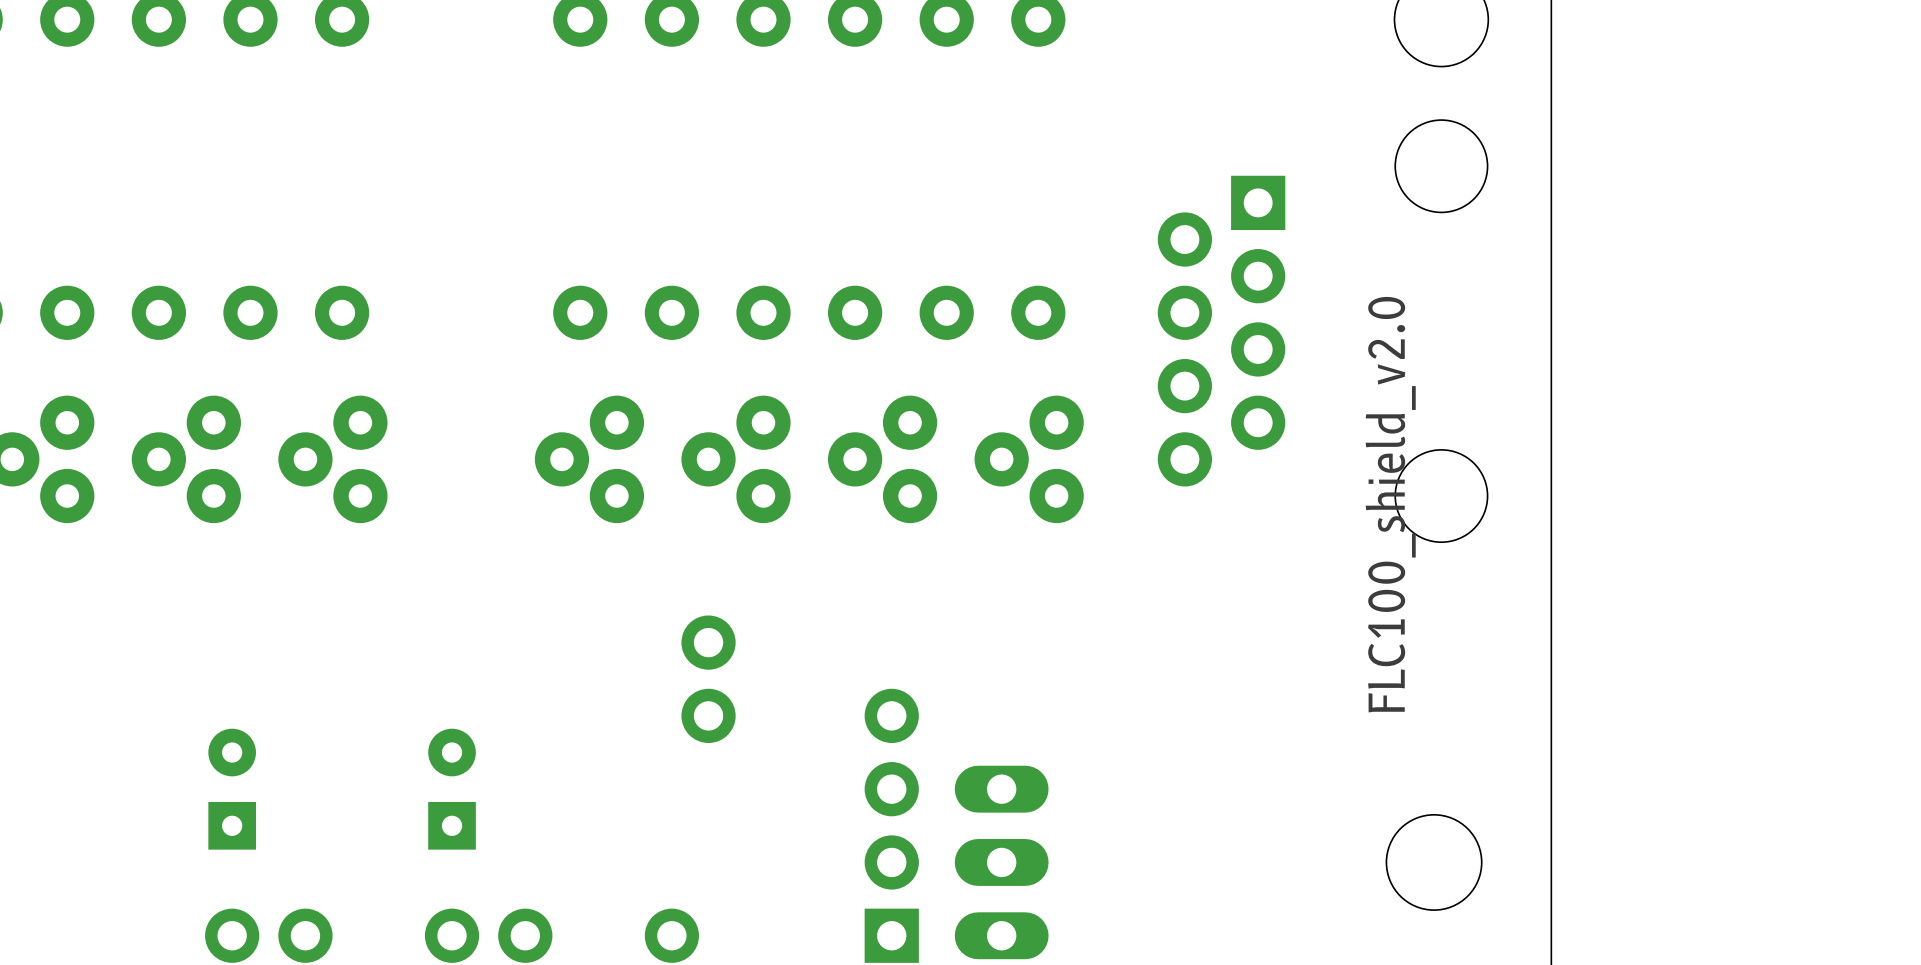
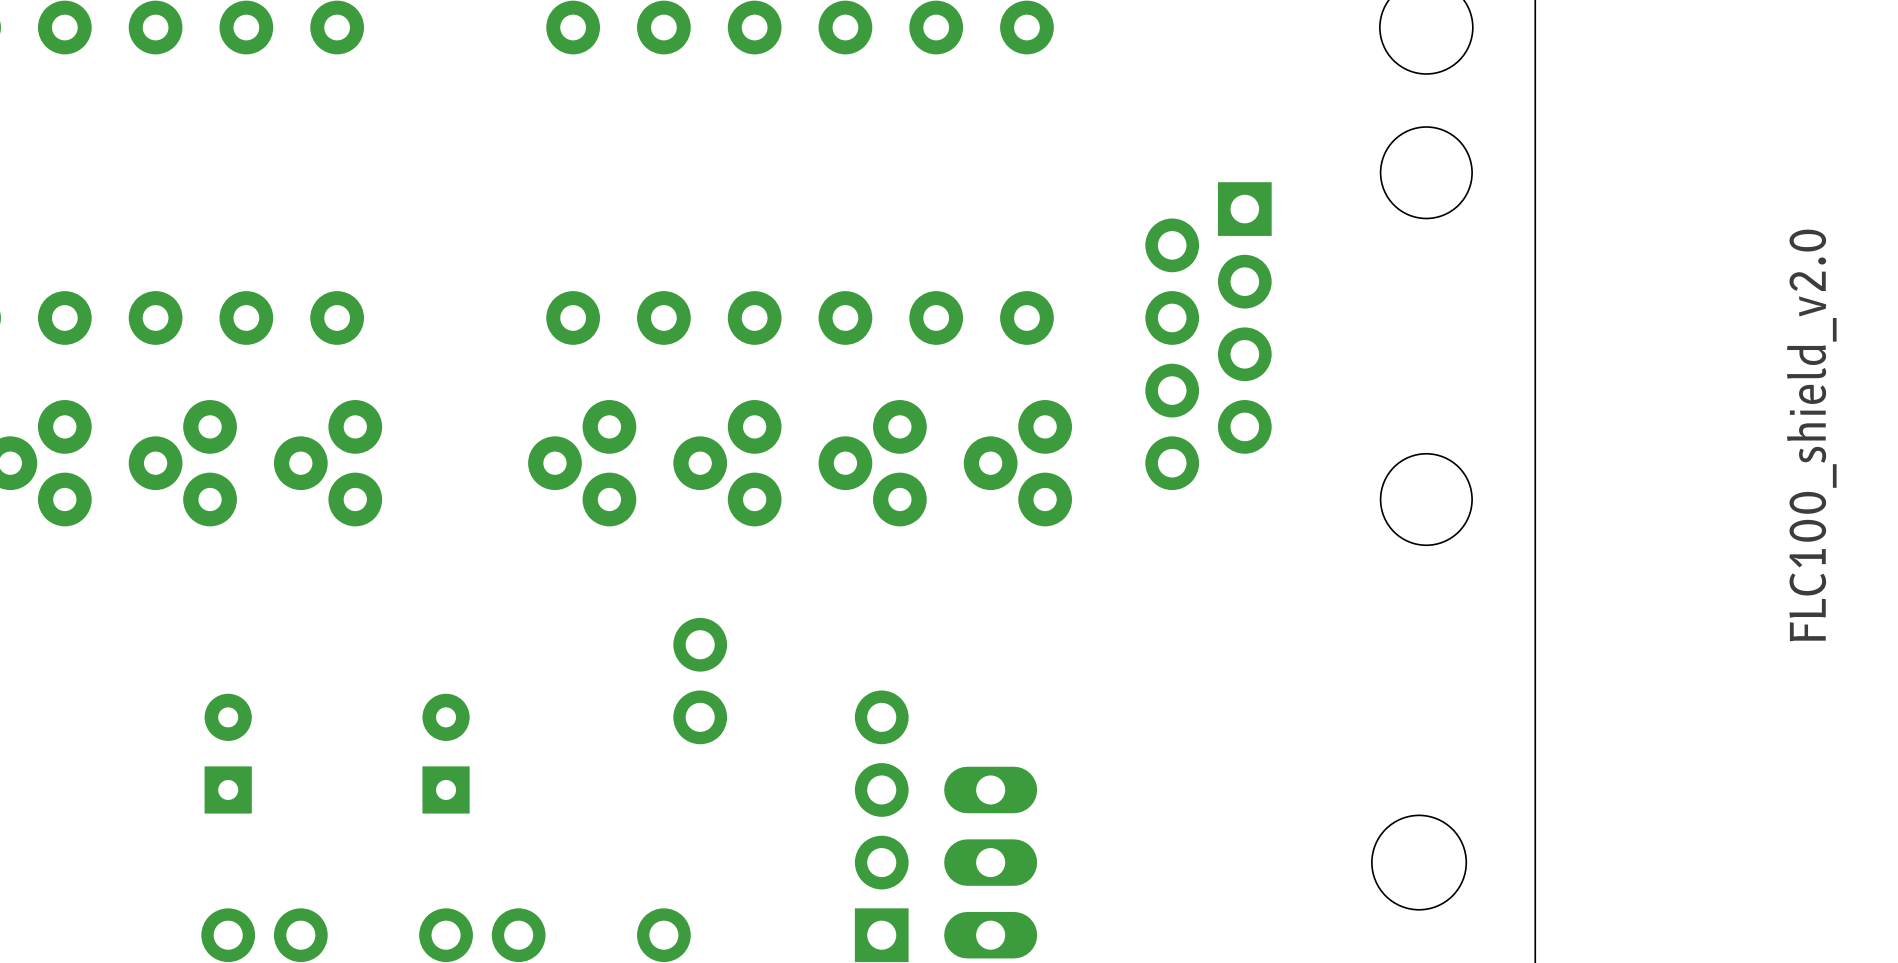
text position: FLC100_shield_v2.0 (1390, 504) -> FLC100_shield_v2.0 (1811, 435)
part position: (232, 789) -> (228, 753)
part position: (452, 789) -> (446, 753)

